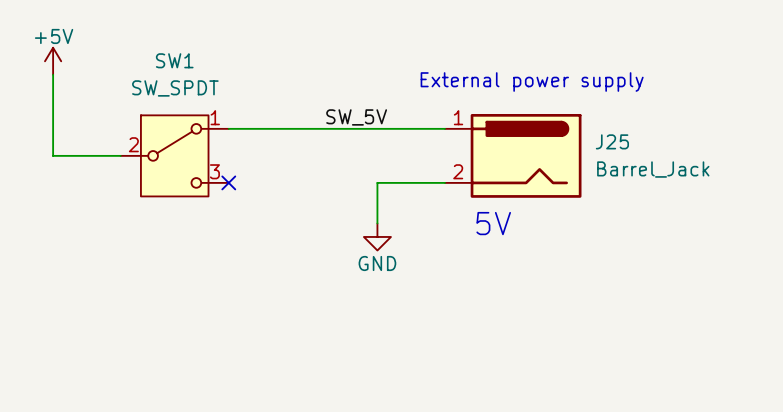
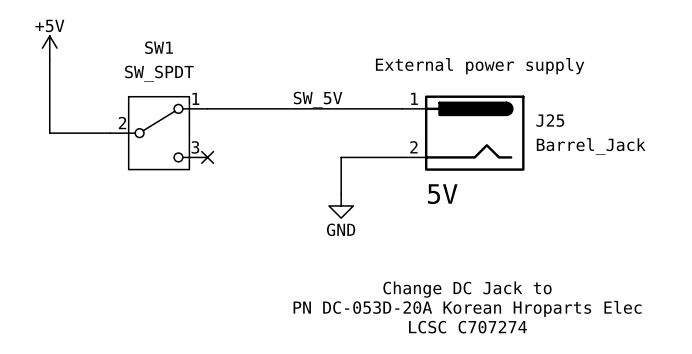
text: none -> Change DC Jack to (467, 289)
text: none -> PN DC-053D-20A Korean Hroparts Elec (467, 309)
text: none -> LCSC C707274 (467, 327)

